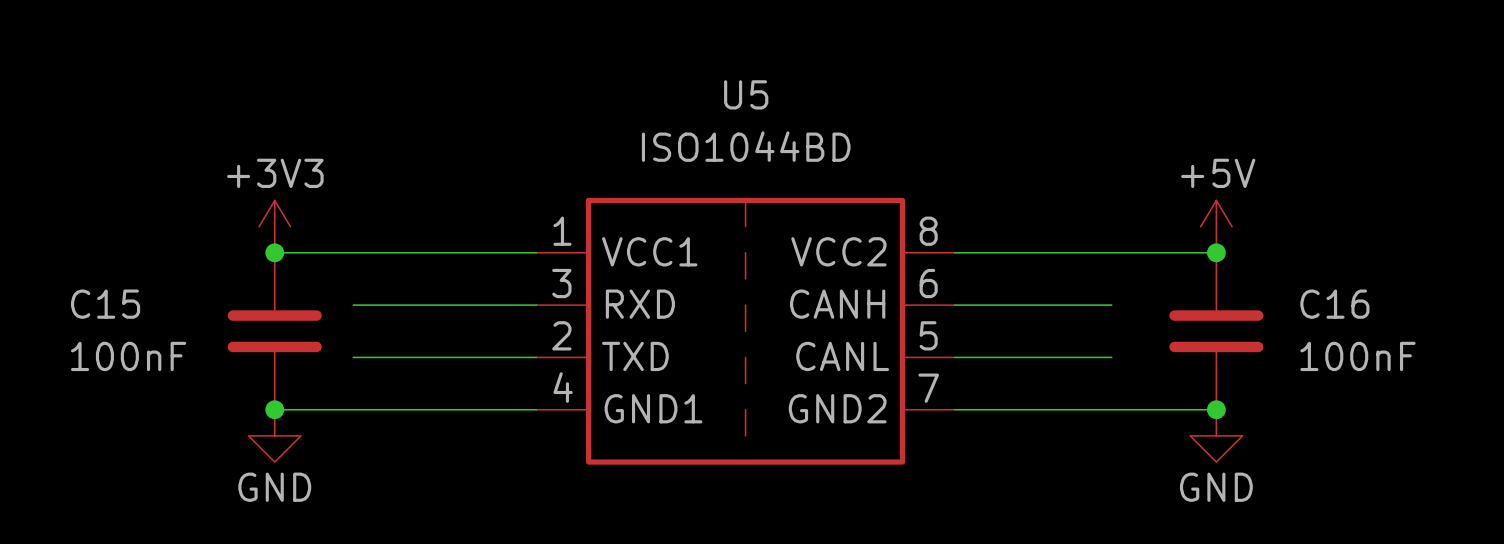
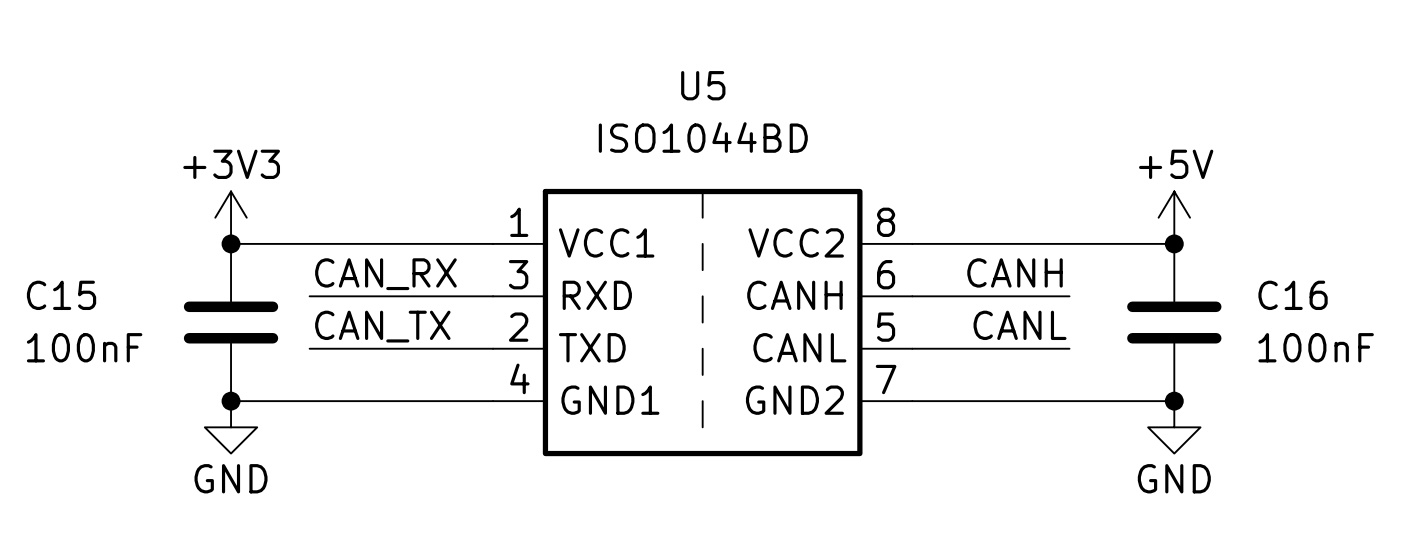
label: none -> CANH (1015, 272)
label: none -> CAN_RX (385, 274)
label: none -> CANL (1020, 325)
label: none -> CAN_TX (382, 326)

